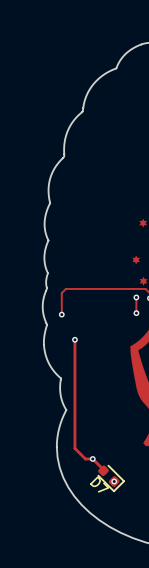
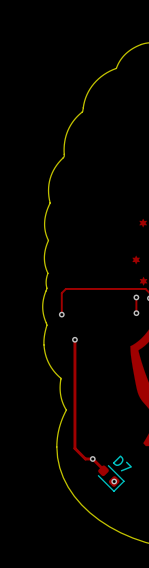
D7 name position: D7 (99, 484) -> D7 (122, 463)

